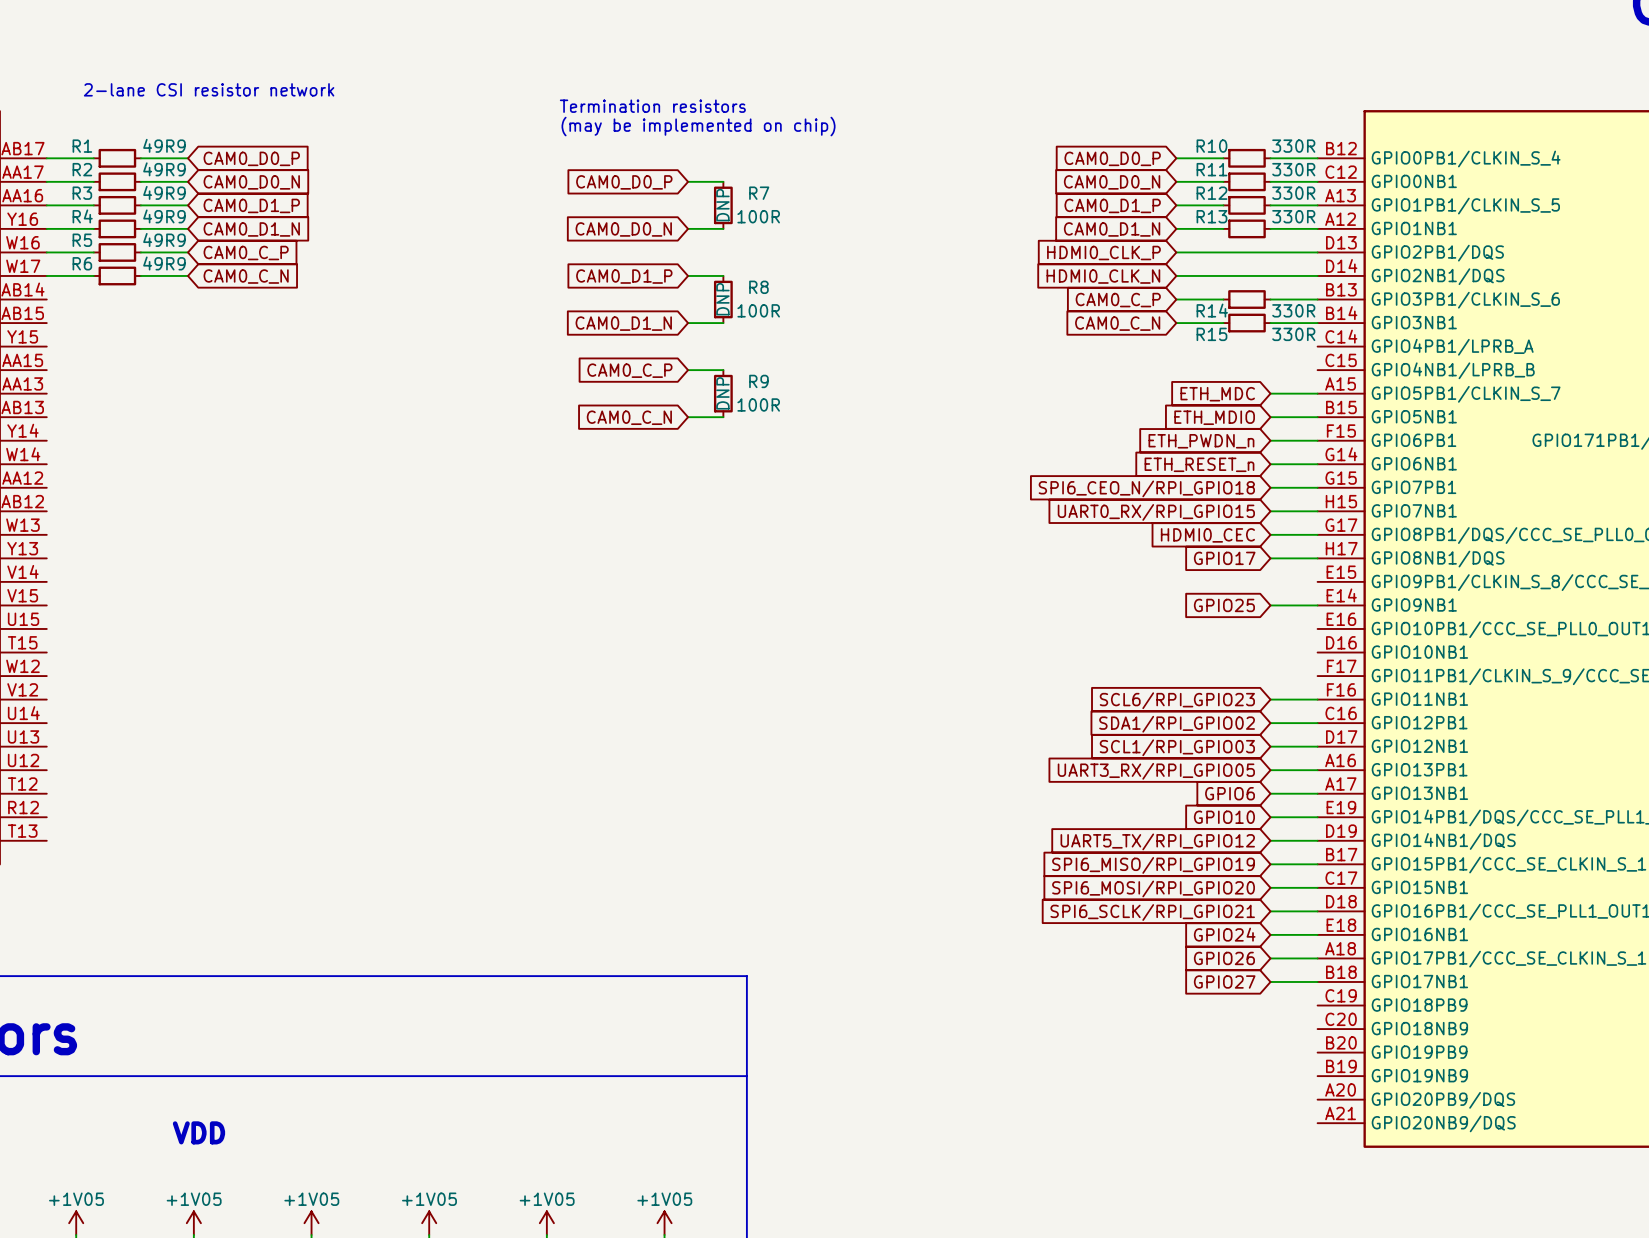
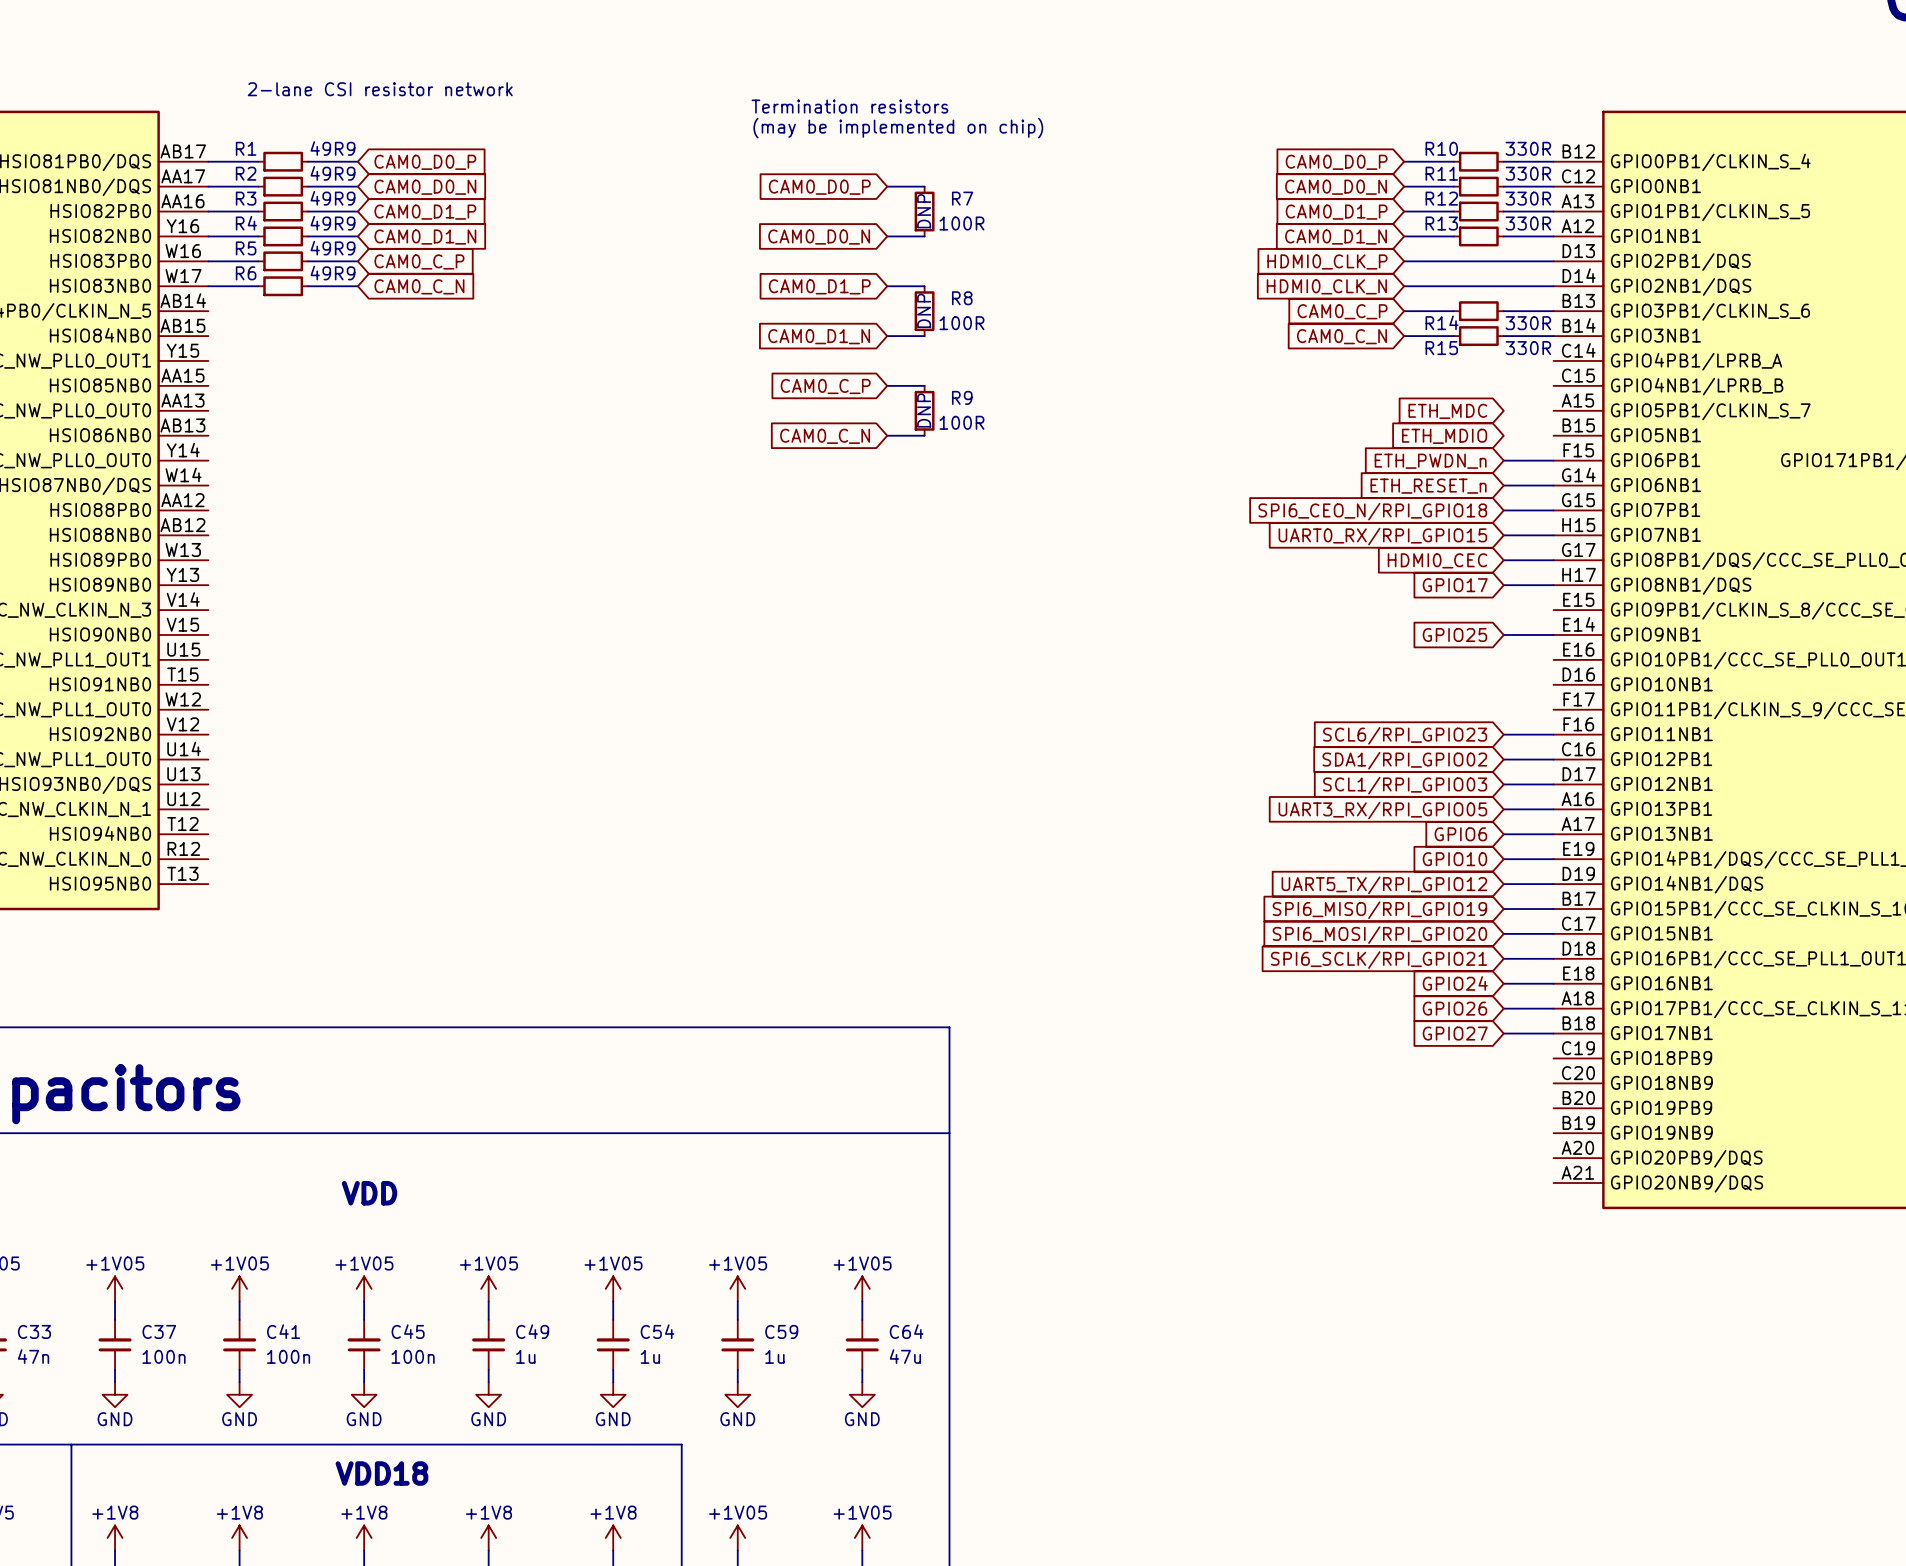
wire: (1270, 393) (1317, 393) -> none
wire: (1270, 417) (1317, 417) -> none

